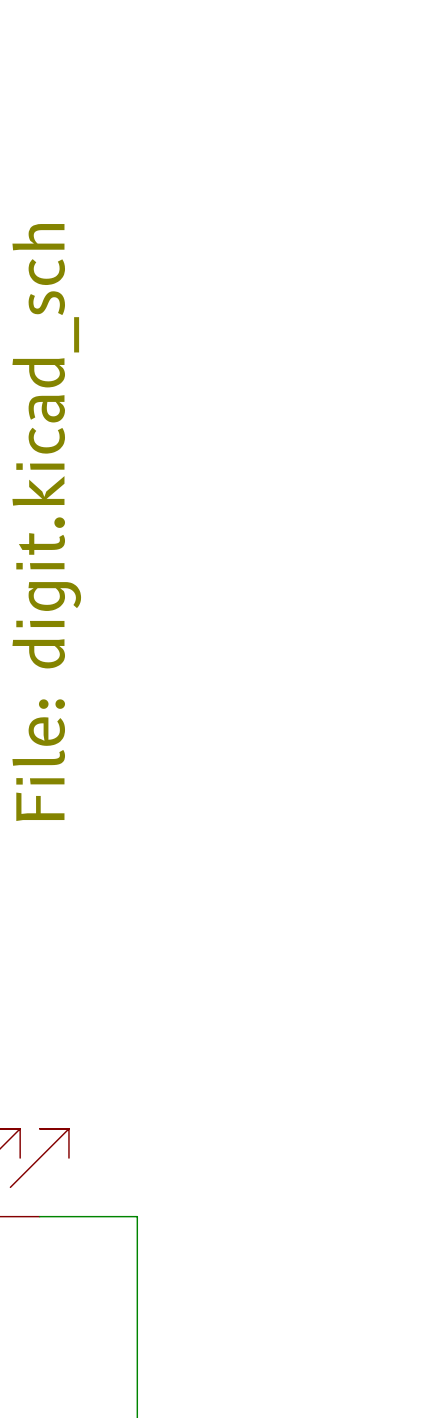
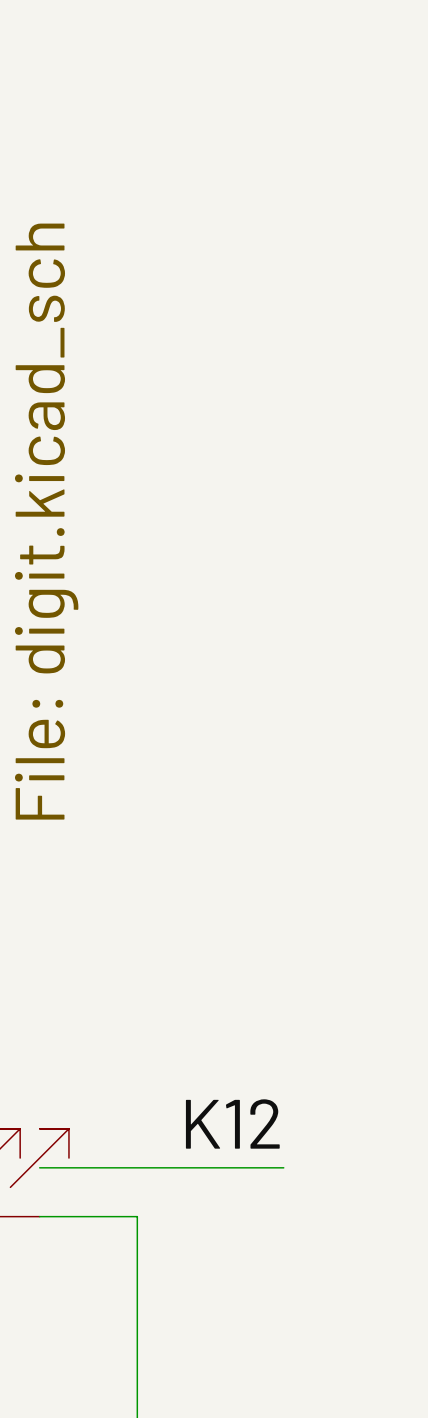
label: none -> K12 (232, 1123)
wire: none -> (39, 1167) (283, 1167)

